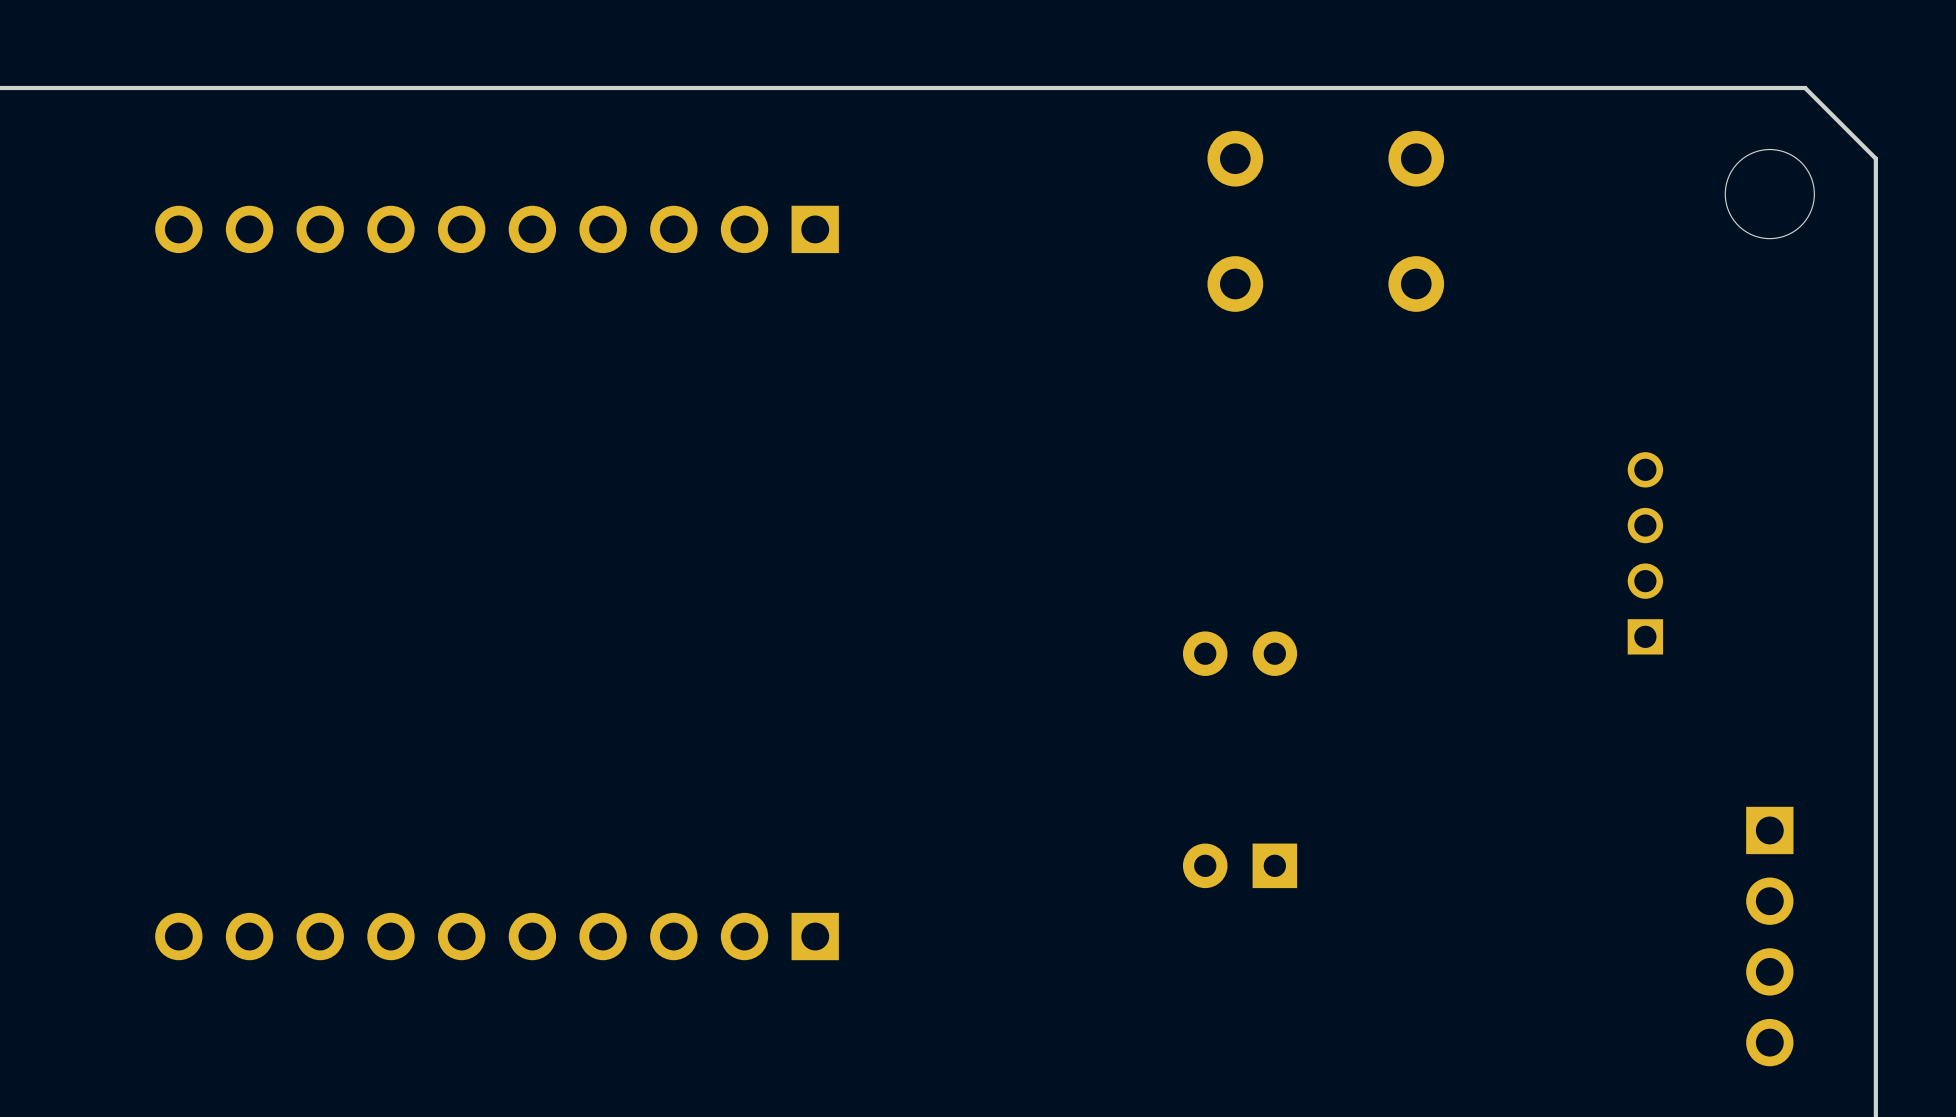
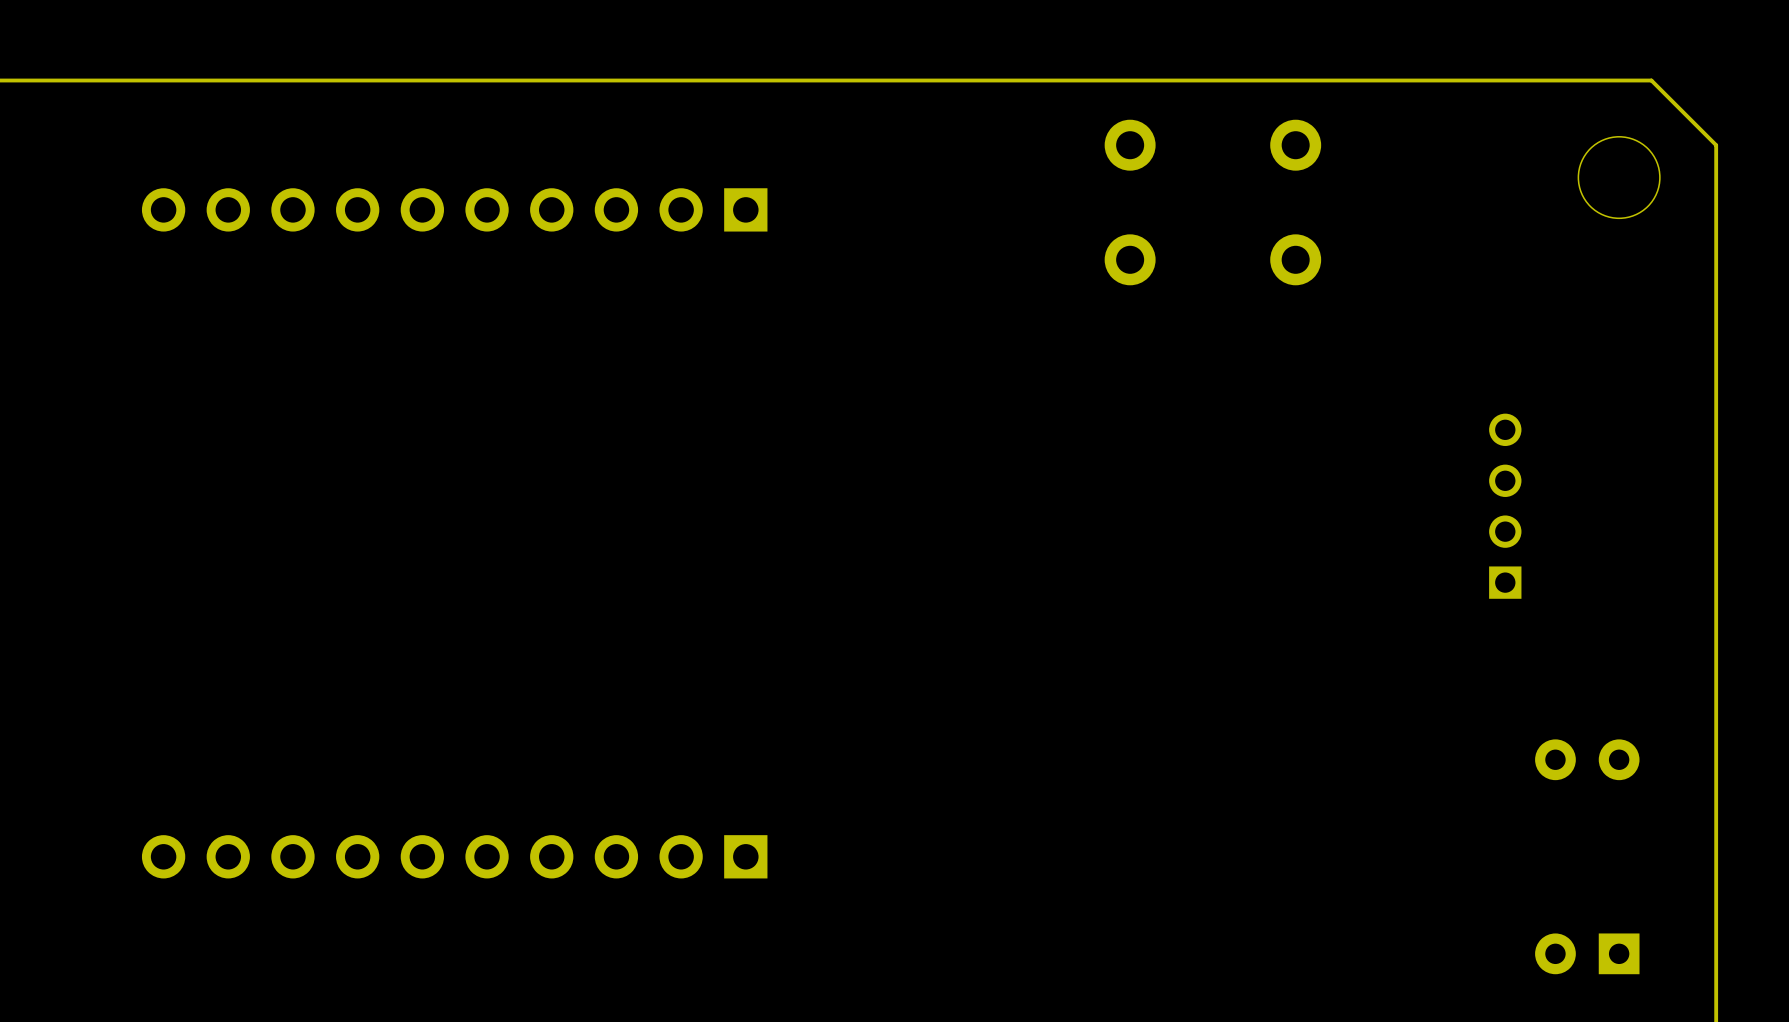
part position: (1240, 653) -> (1587, 759)
part position: (1240, 865) -> (1587, 953)
part: (1769, 936) -> none

